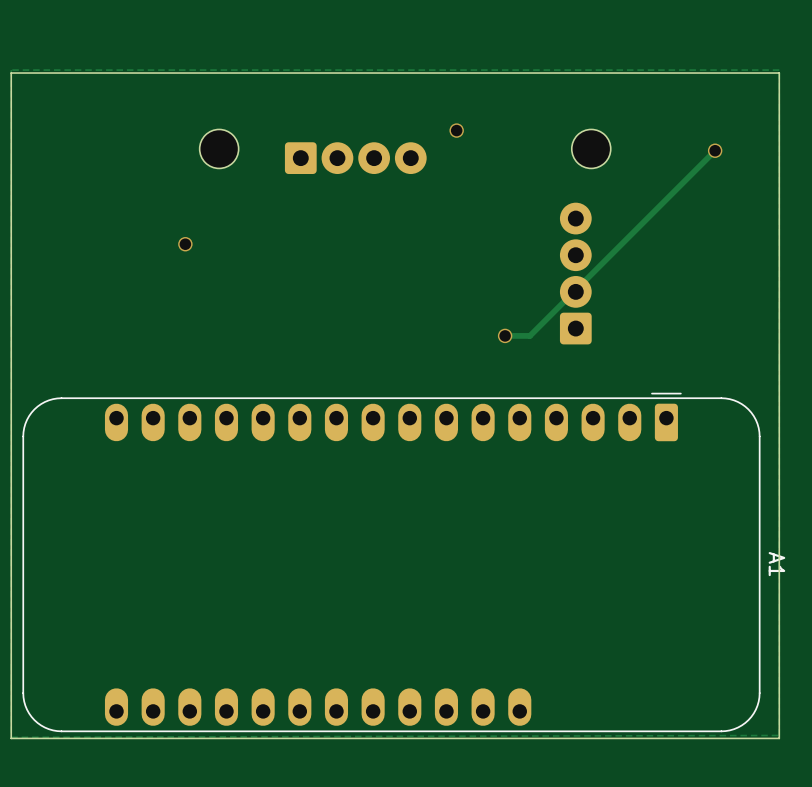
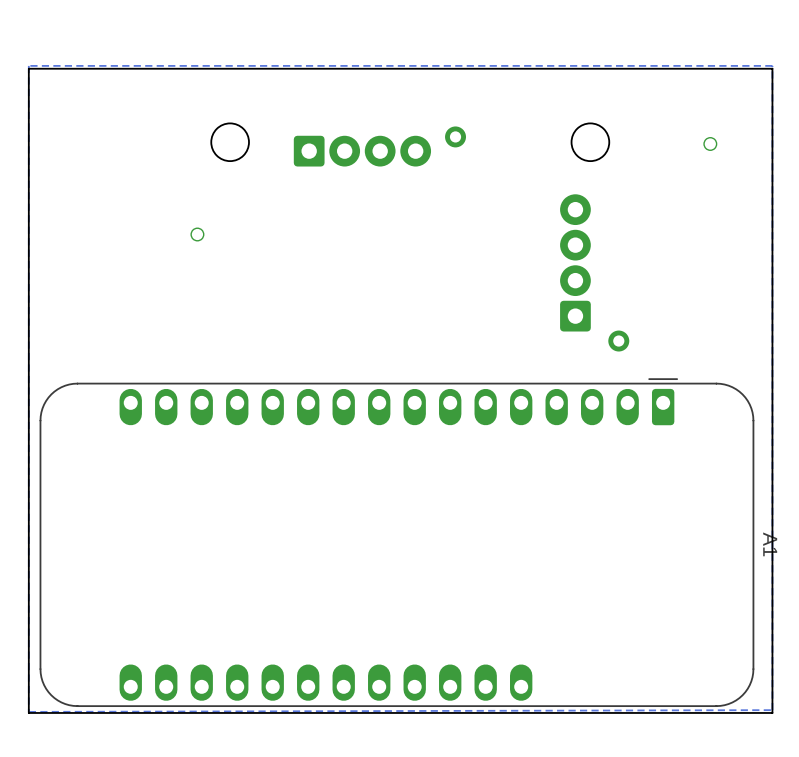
via size: [449, 123, 464, 138] -> [445, 126, 467, 148]
track: (715, 150) (529, 335) (505, 335) -> none
via: (505, 335) -> none
via: none -> (618, 341)

